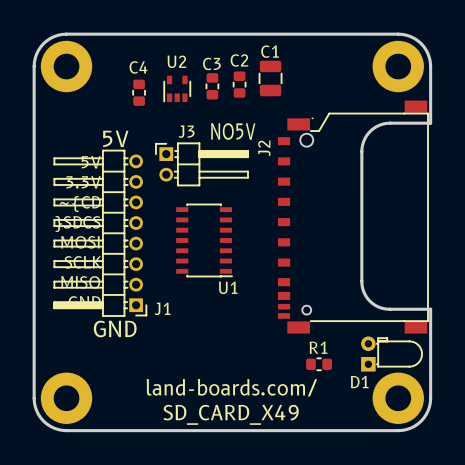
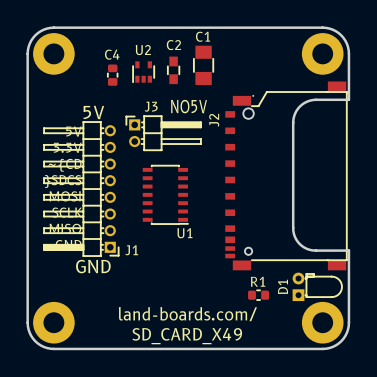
C1 footprint: [259, 60, 283, 97] -> [193, 45, 214, 86]
C2 footprint: [233, 71, 247, 98] -> [167, 56, 180, 85]
C3: (212, 86) -> none
D1 name rotation: 0° (359, 382) -> 90° counterclockwise (283, 286)

